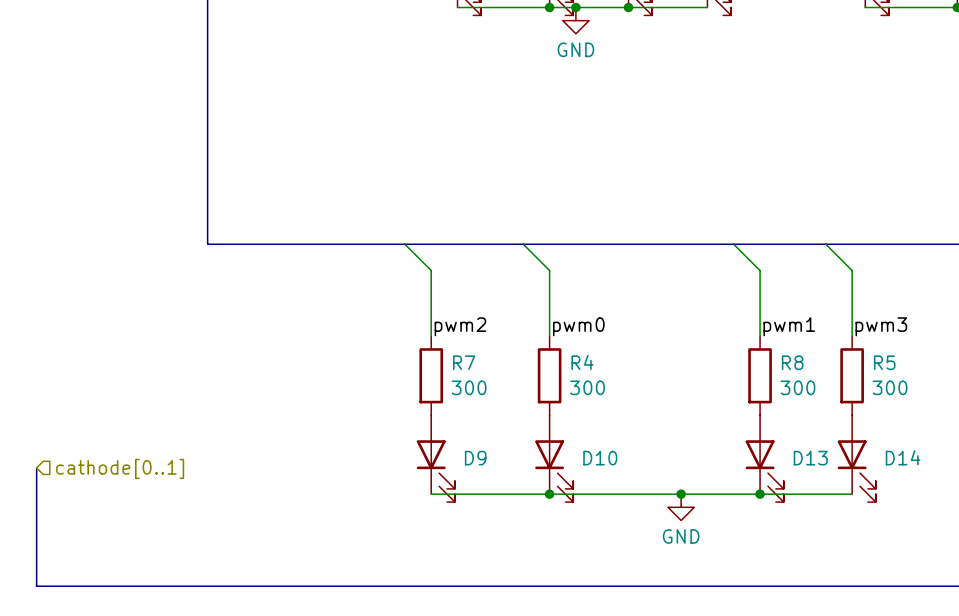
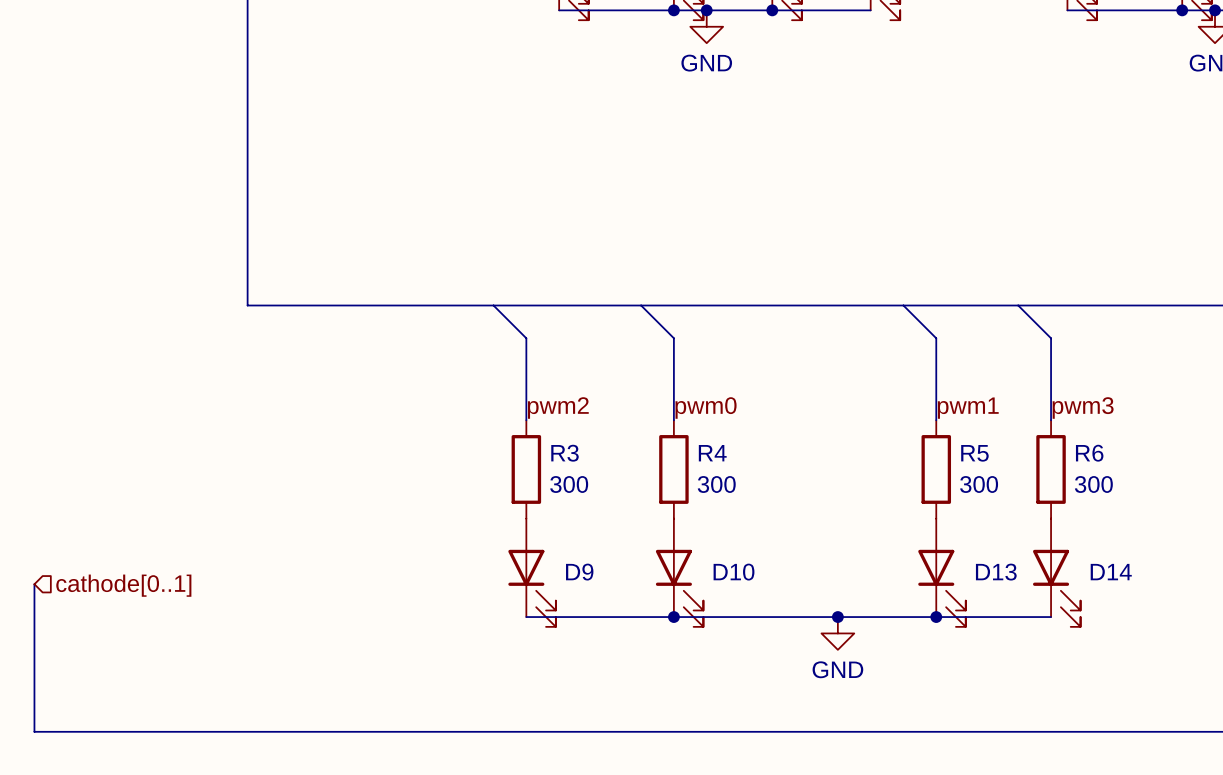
R7 name: R7 (464, 362) -> R3 (564, 453)
R8 name: R8 (792, 362) -> R5 (974, 453)
R5 name: R5 (884, 362) -> R6 (1089, 453)

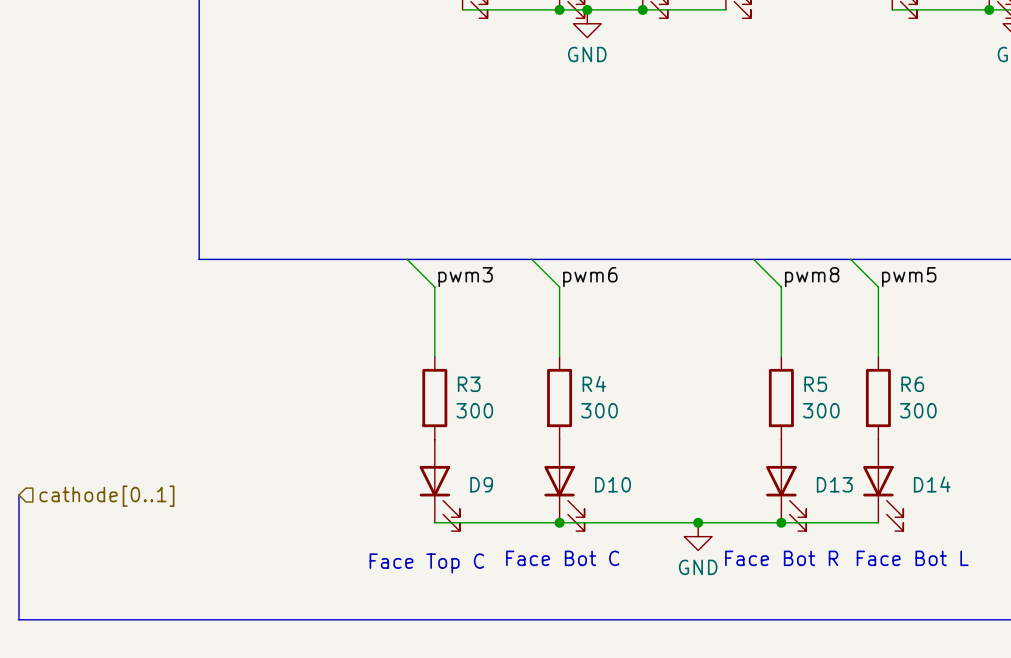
label: none -> pwm3 (465, 277)
label: none -> pwm6 (590, 277)
label: none -> pwm8 (812, 277)
label: none -> pwm5 (909, 277)
label: pwm2 (558, 408) -> none
label: pwm0 (706, 408) -> none
label: pwm1 (968, 408) -> none
label: pwm3 (1083, 408) -> none
text: none -> Face Bot C (562, 558)
text: none -> Face Bot R (781, 558)
text: none -> Face Bot L (912, 558)
text: none -> Face Top C (426, 563)

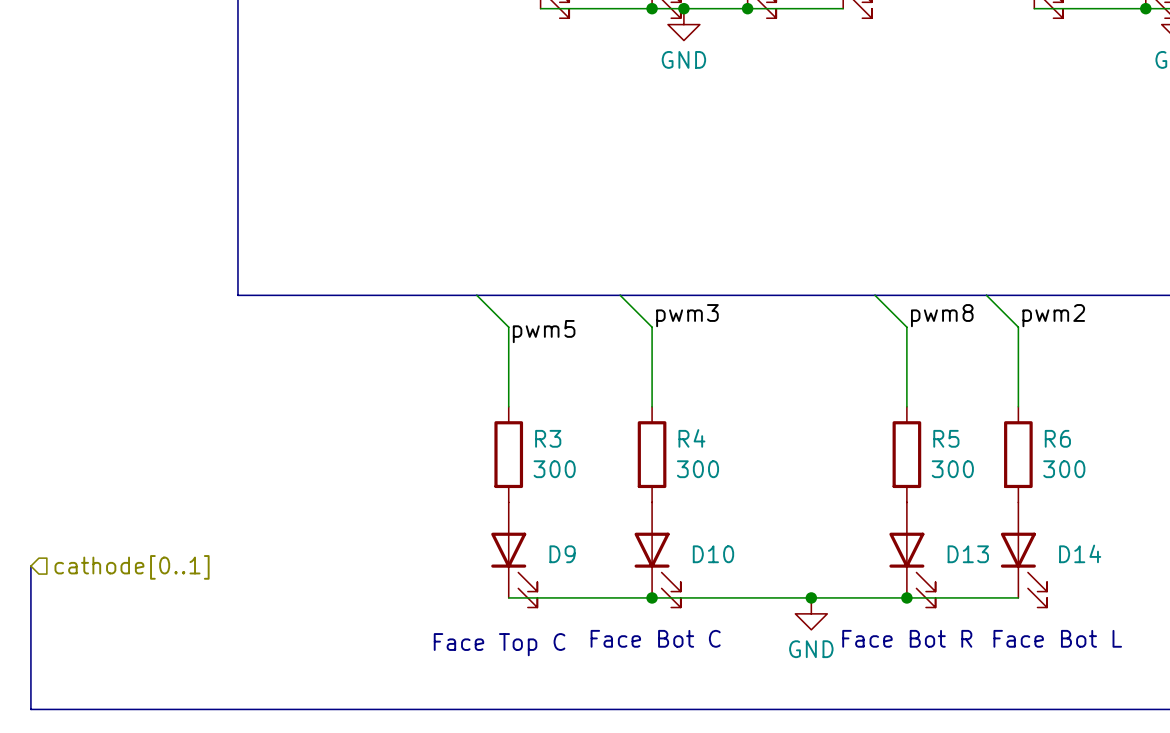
label: pwm3 (465, 277) -> pwm5 (544, 331)
label: pwm6 (590, 277) -> pwm3 (687, 315)
label: pwm5 (909, 277) -> pwm2 (1053, 315)

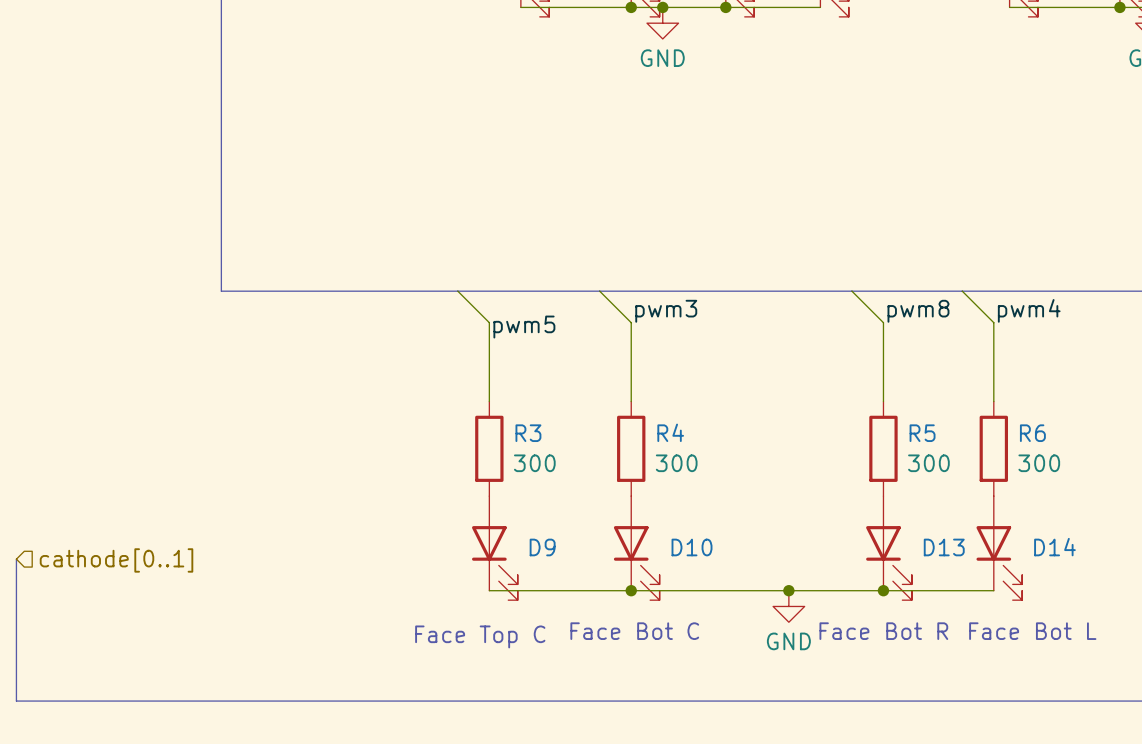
label: pwm2 (1053, 315) -> pwm4 (1029, 310)

